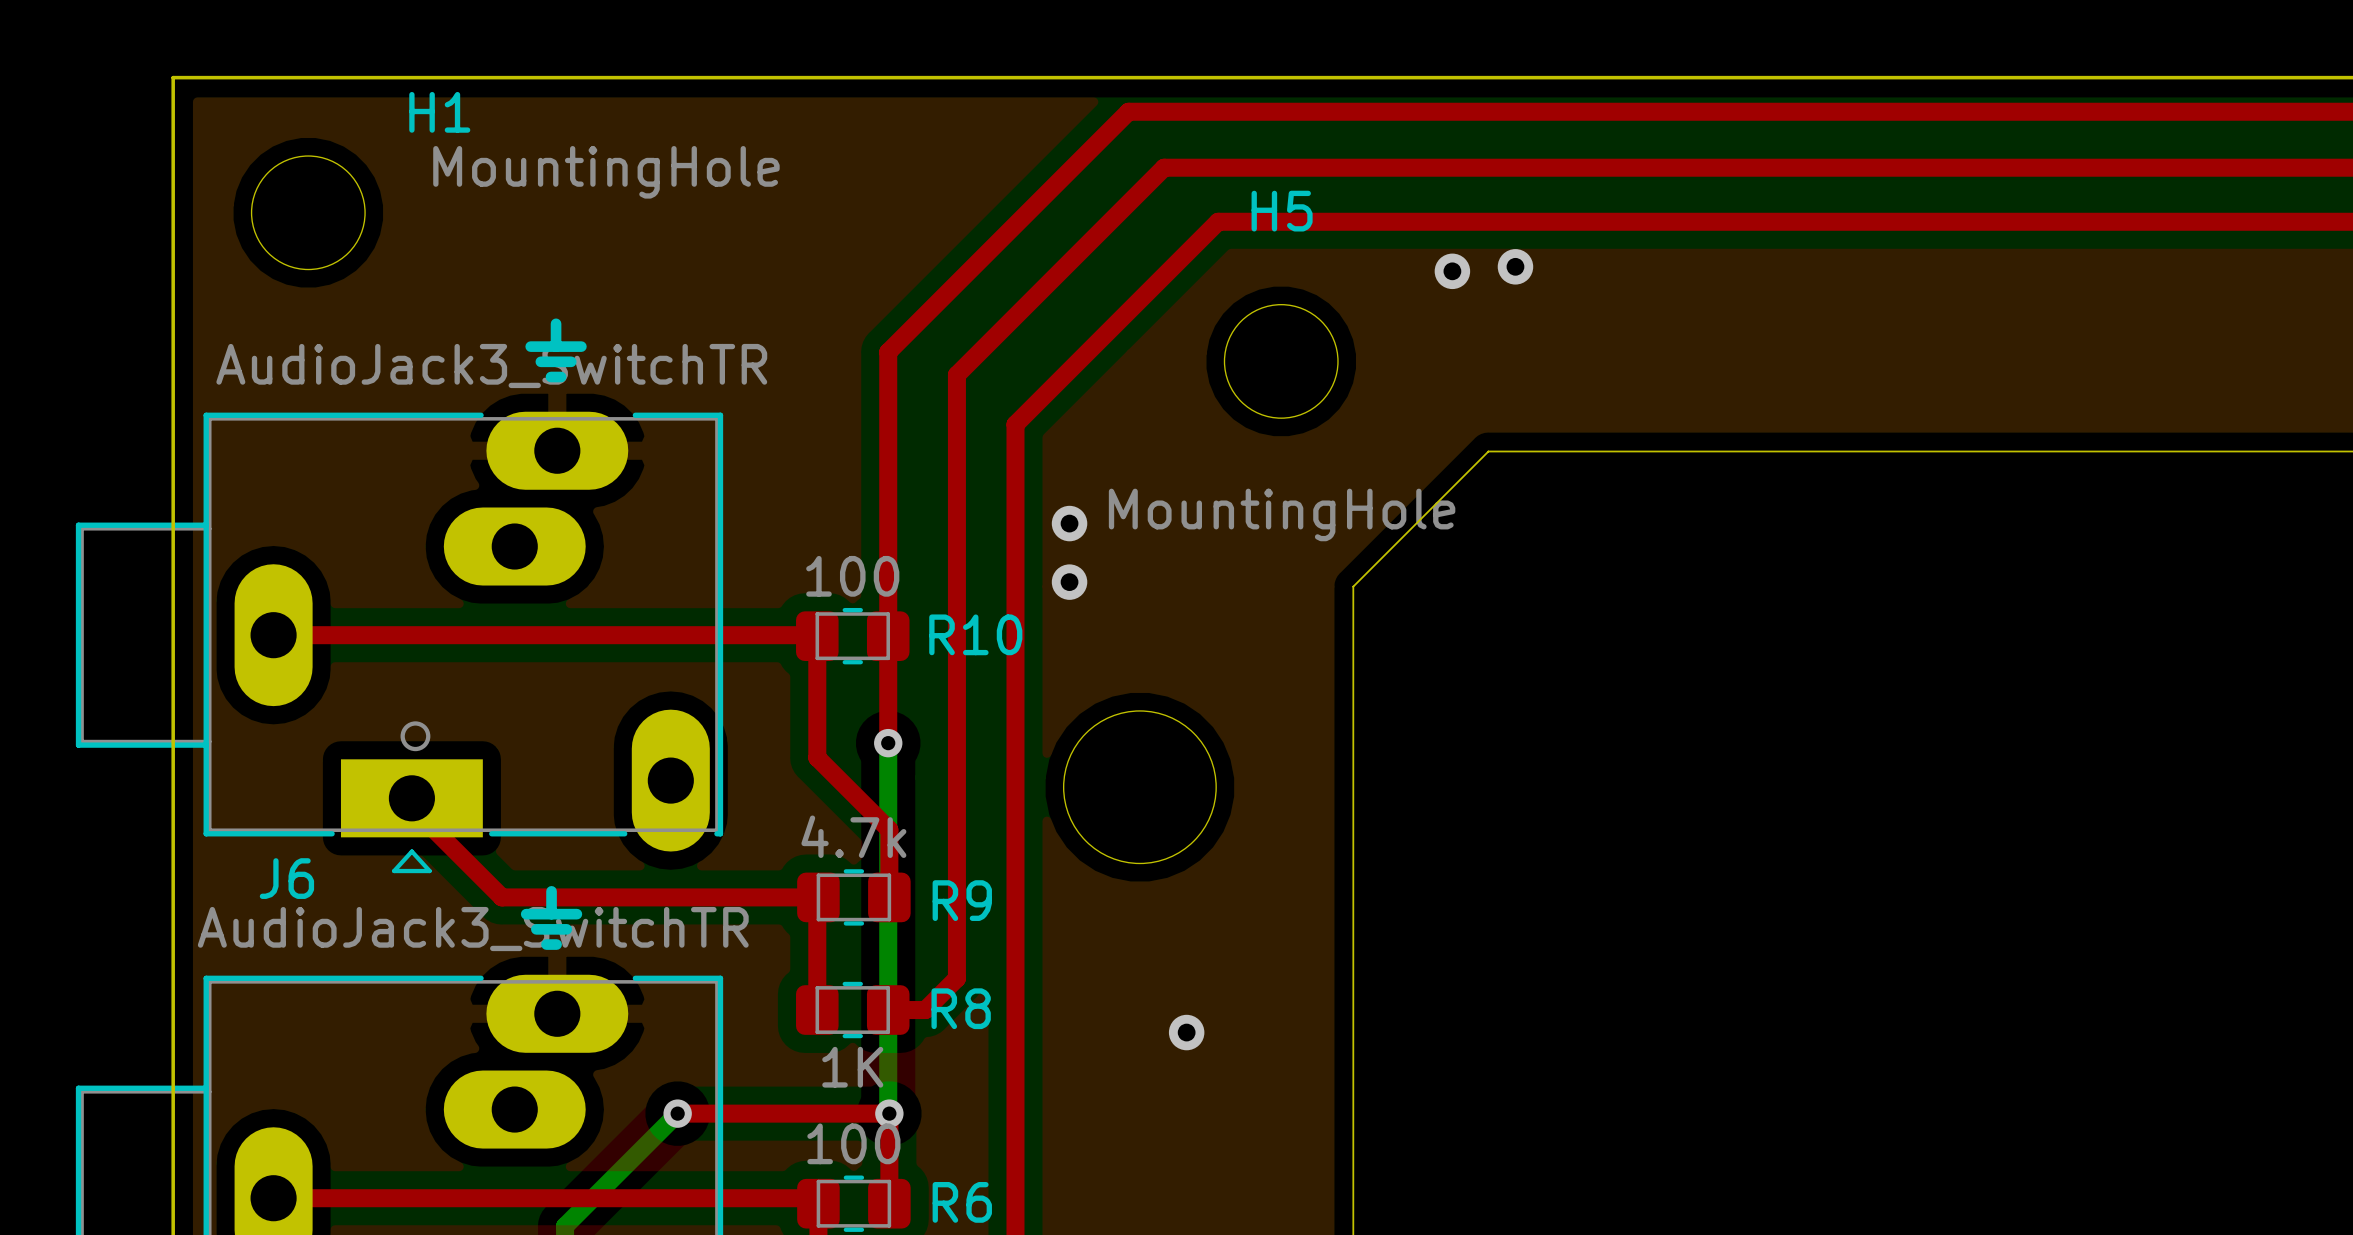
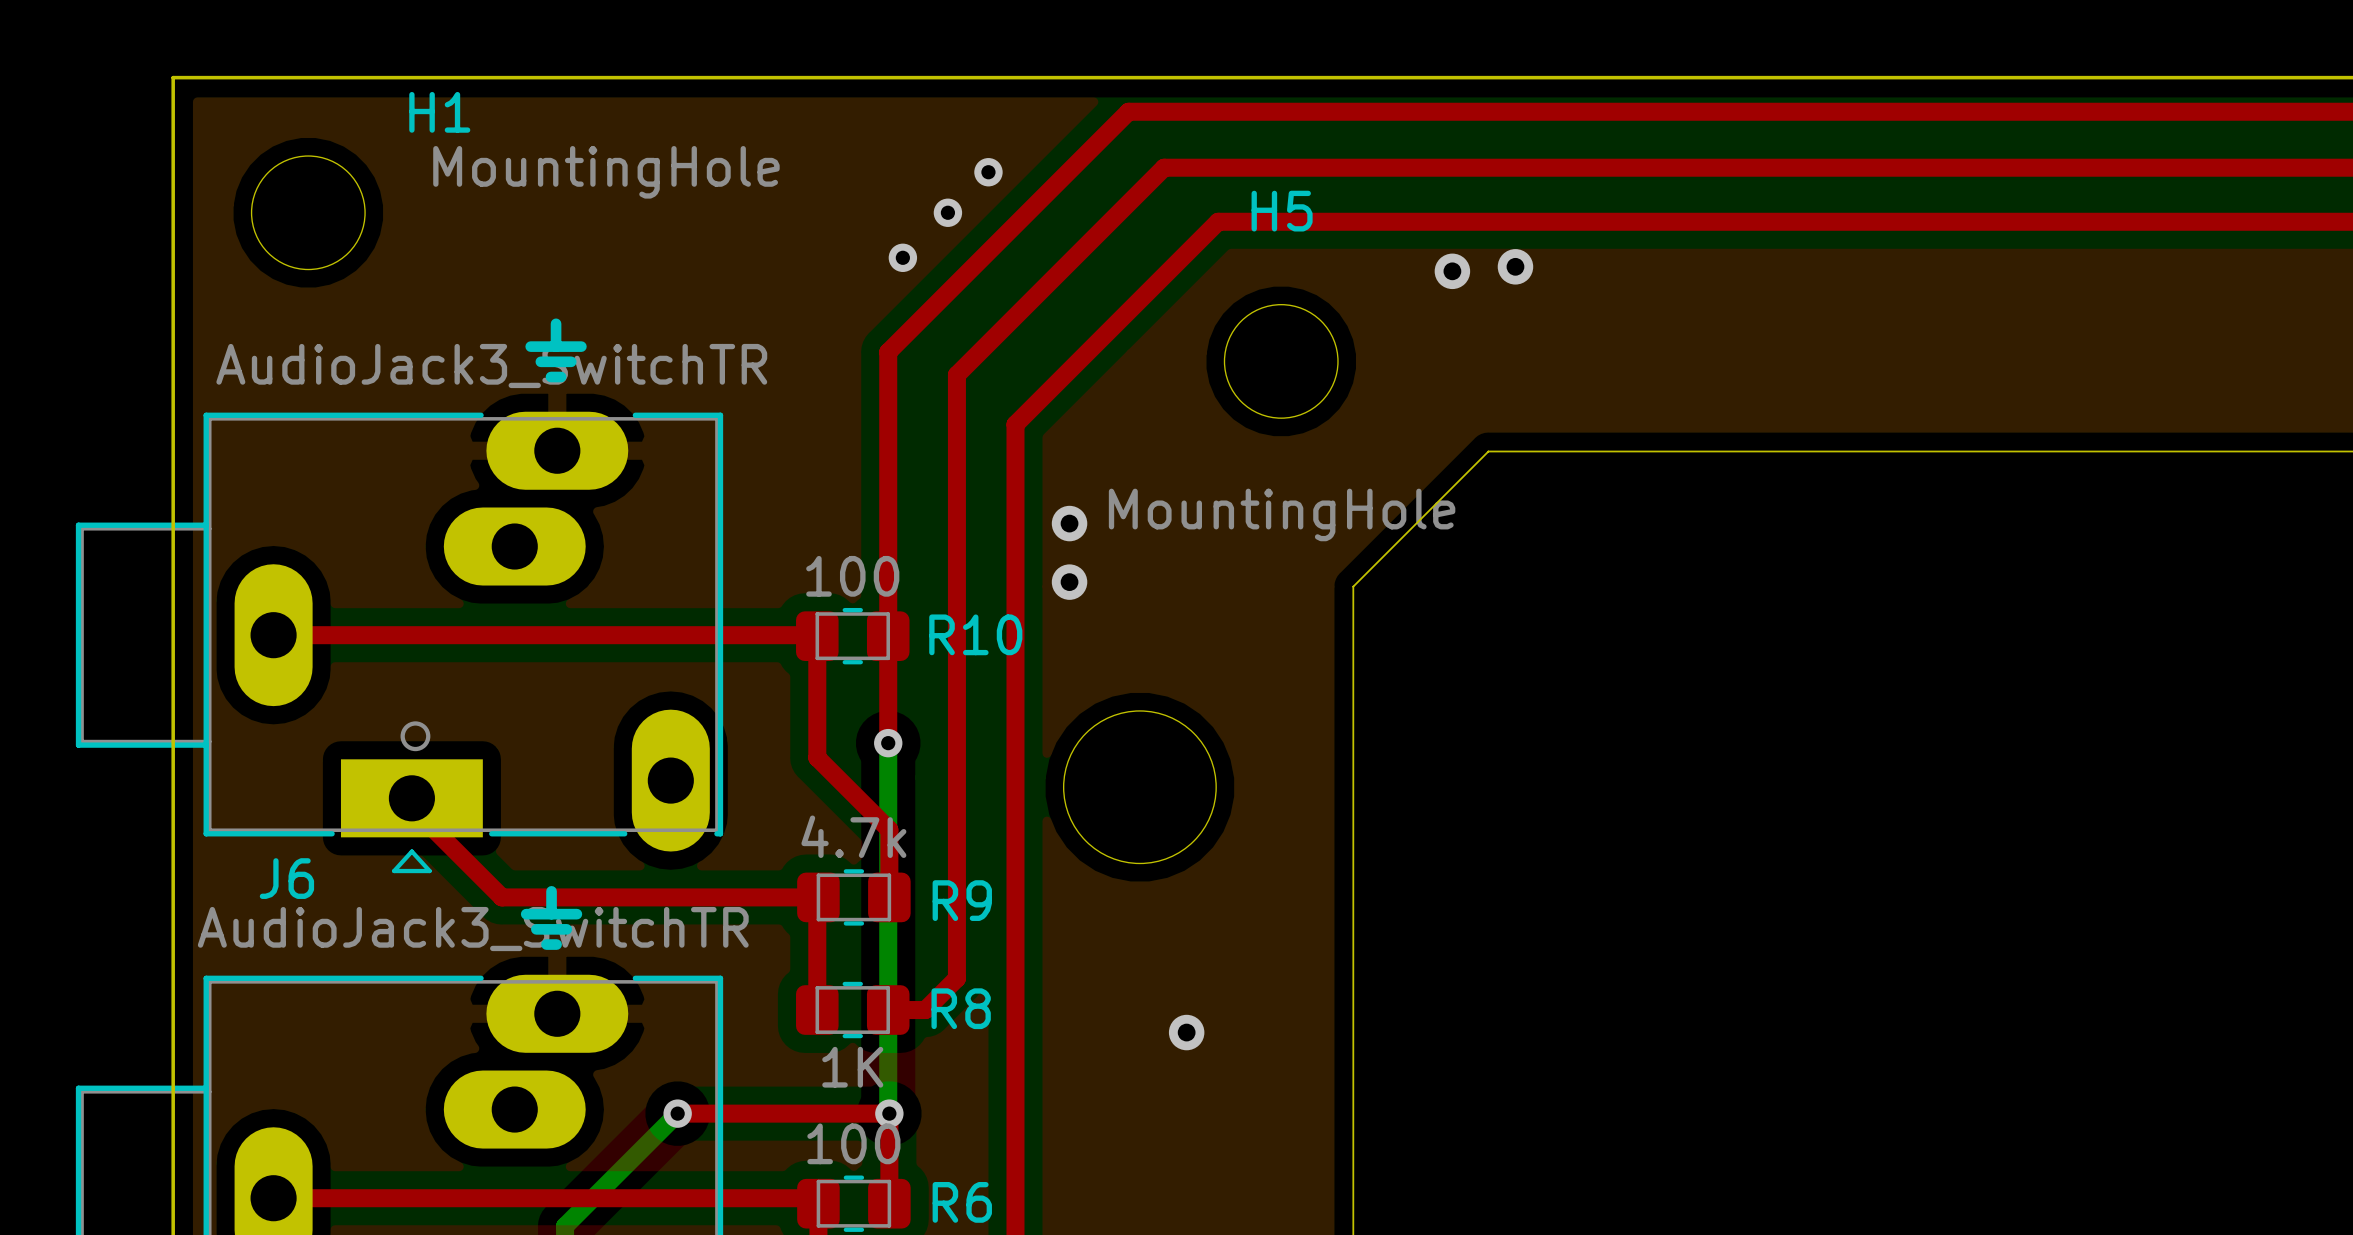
via: none -> (988, 172)
via: none -> (947, 212)
via: none -> (902, 257)

